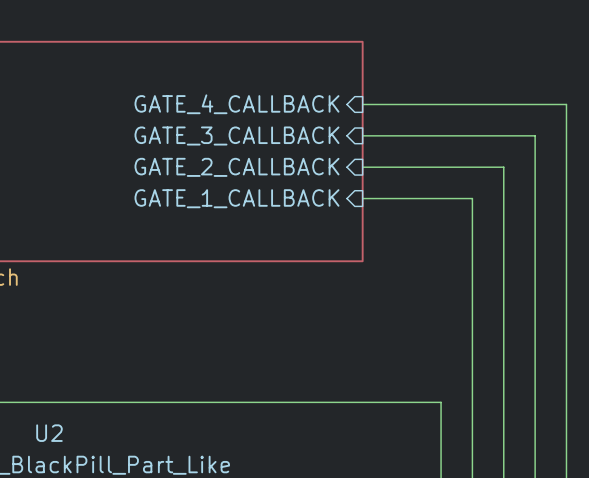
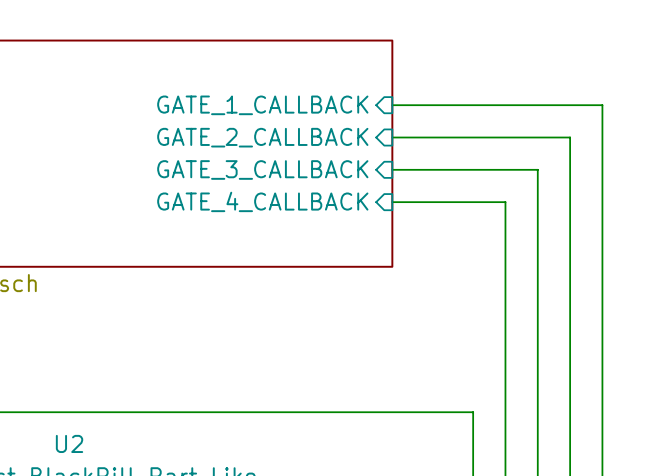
sheet pin: GATE_4_CALLBACK (236, 104) -> GATE_1_CALLBACK (262, 105)
sheet pin: GATE_3_CALLBACK (236, 136) -> GATE_2_CALLBACK (262, 137)
sheet pin: GATE_2_CALLBACK (236, 167) -> GATE_3_CALLBACK (262, 169)
sheet pin: GATE_1_CALLBACK (236, 198) -> GATE_4_CALLBACK (262, 201)

